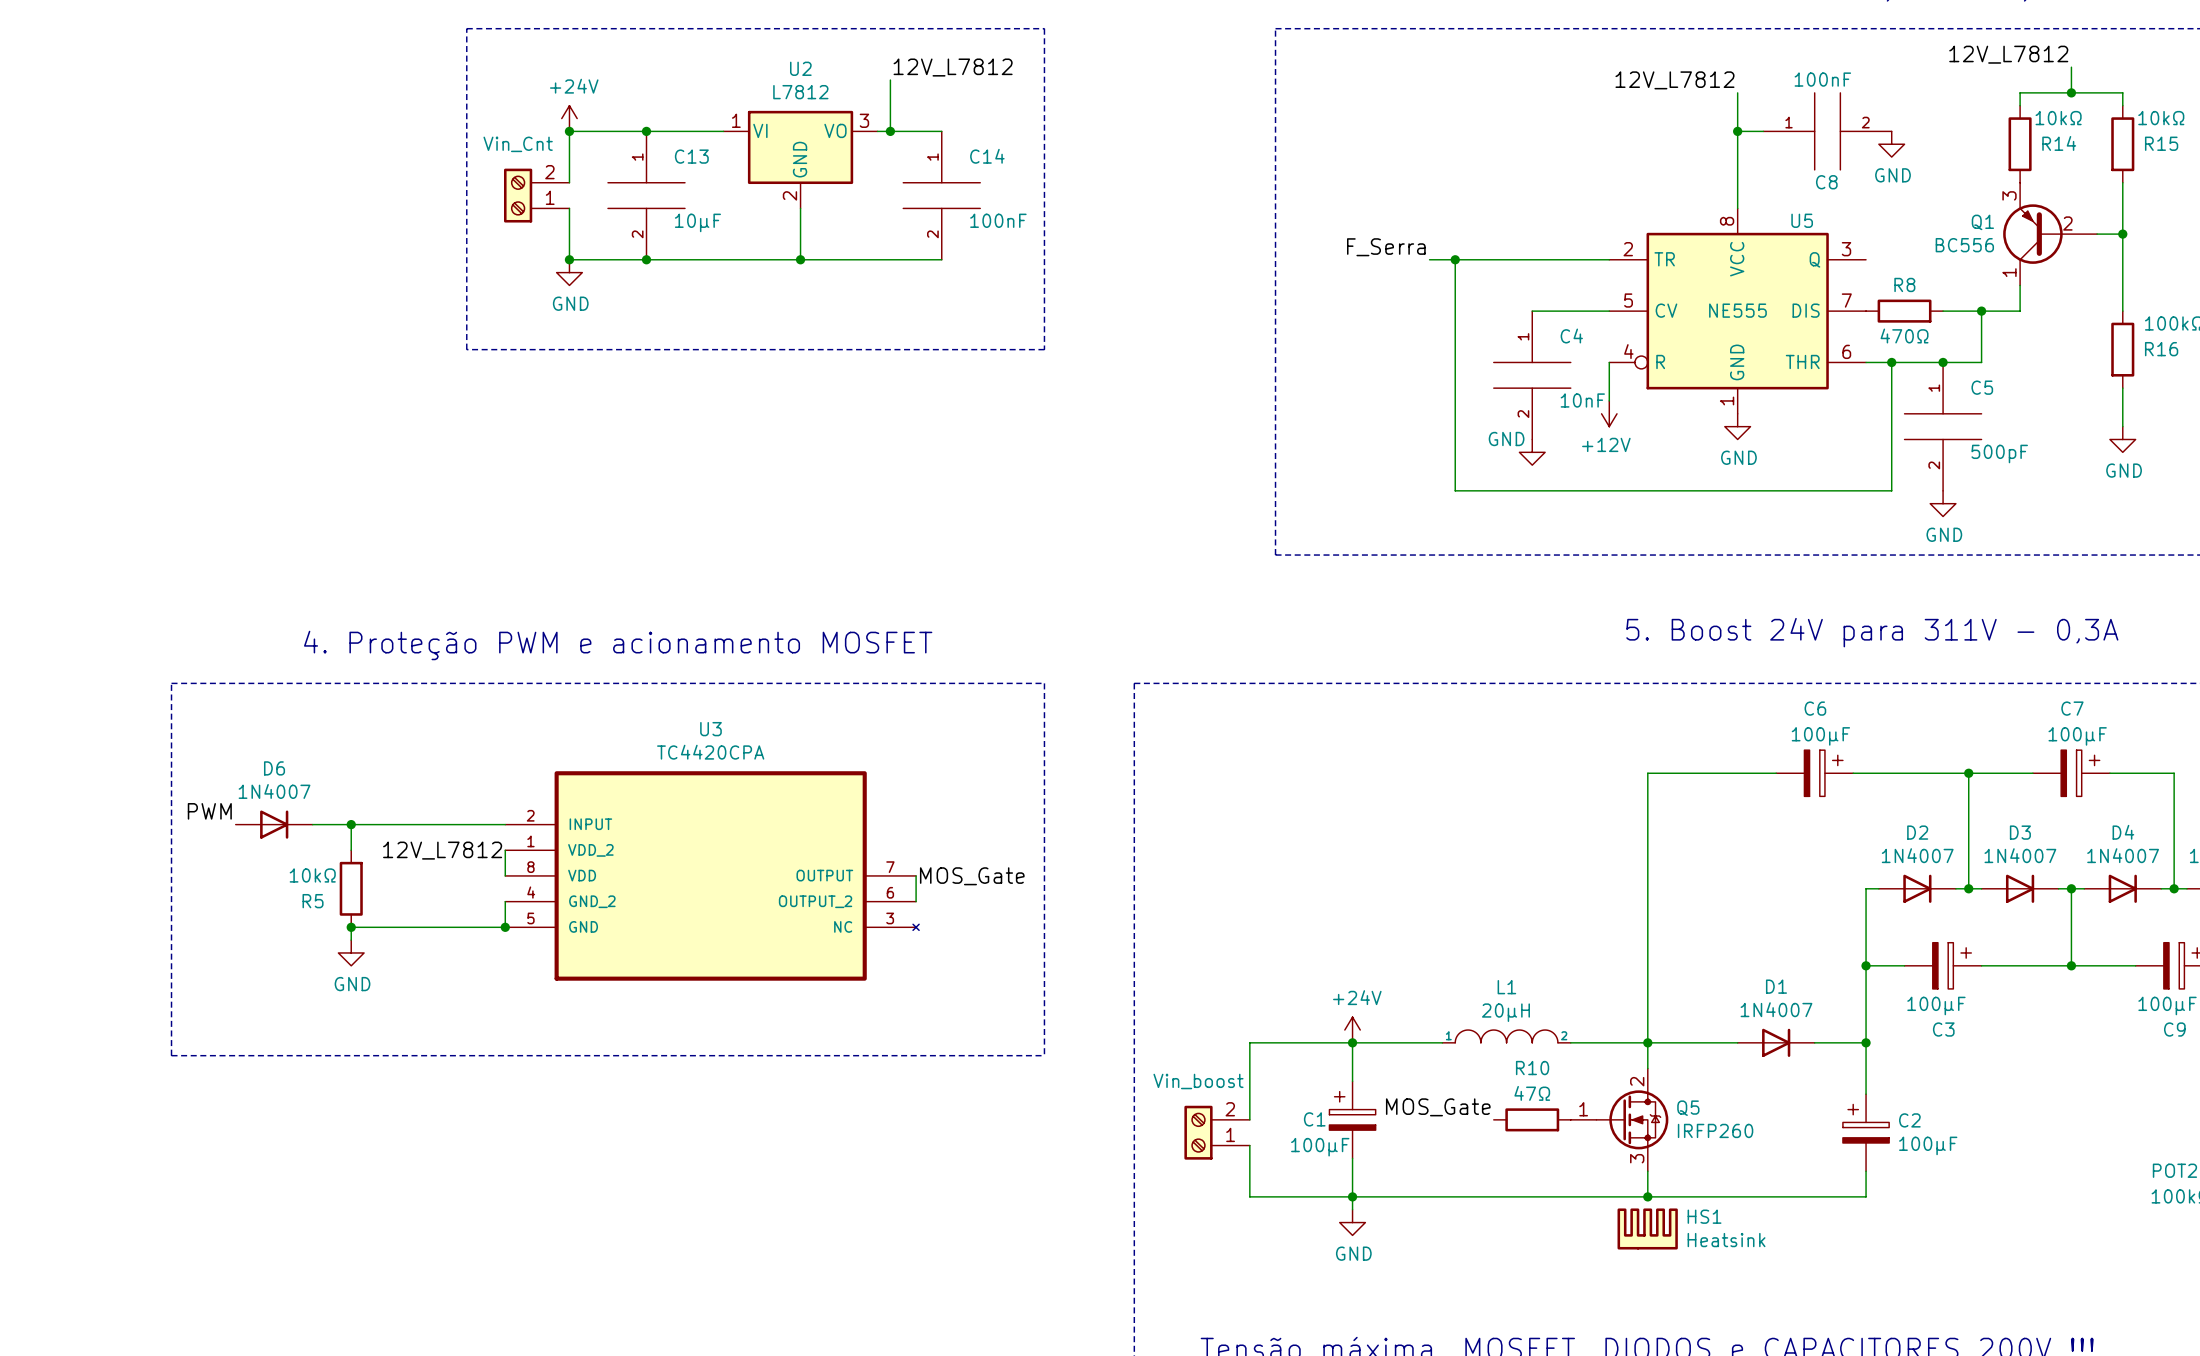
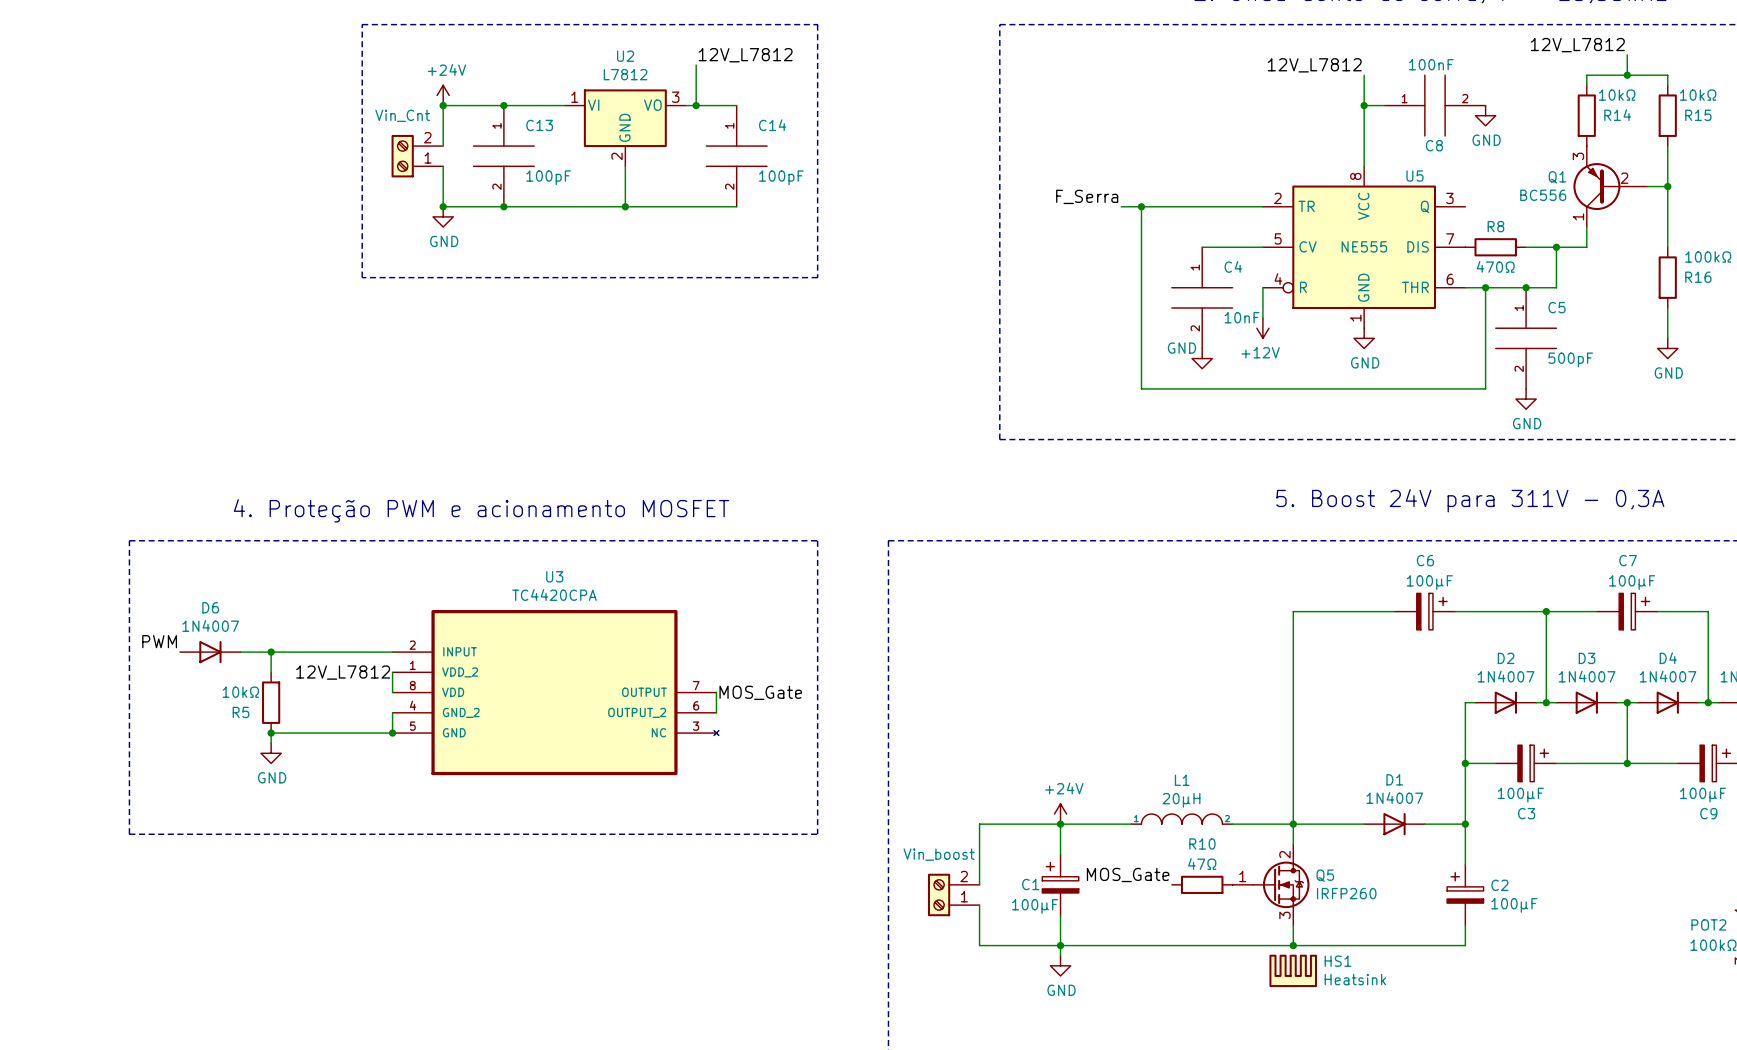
C14 value: 100nF (998, 220) -> 100pF (781, 177)
C13 value: 10µF (697, 222) -> 100pF (548, 177)

